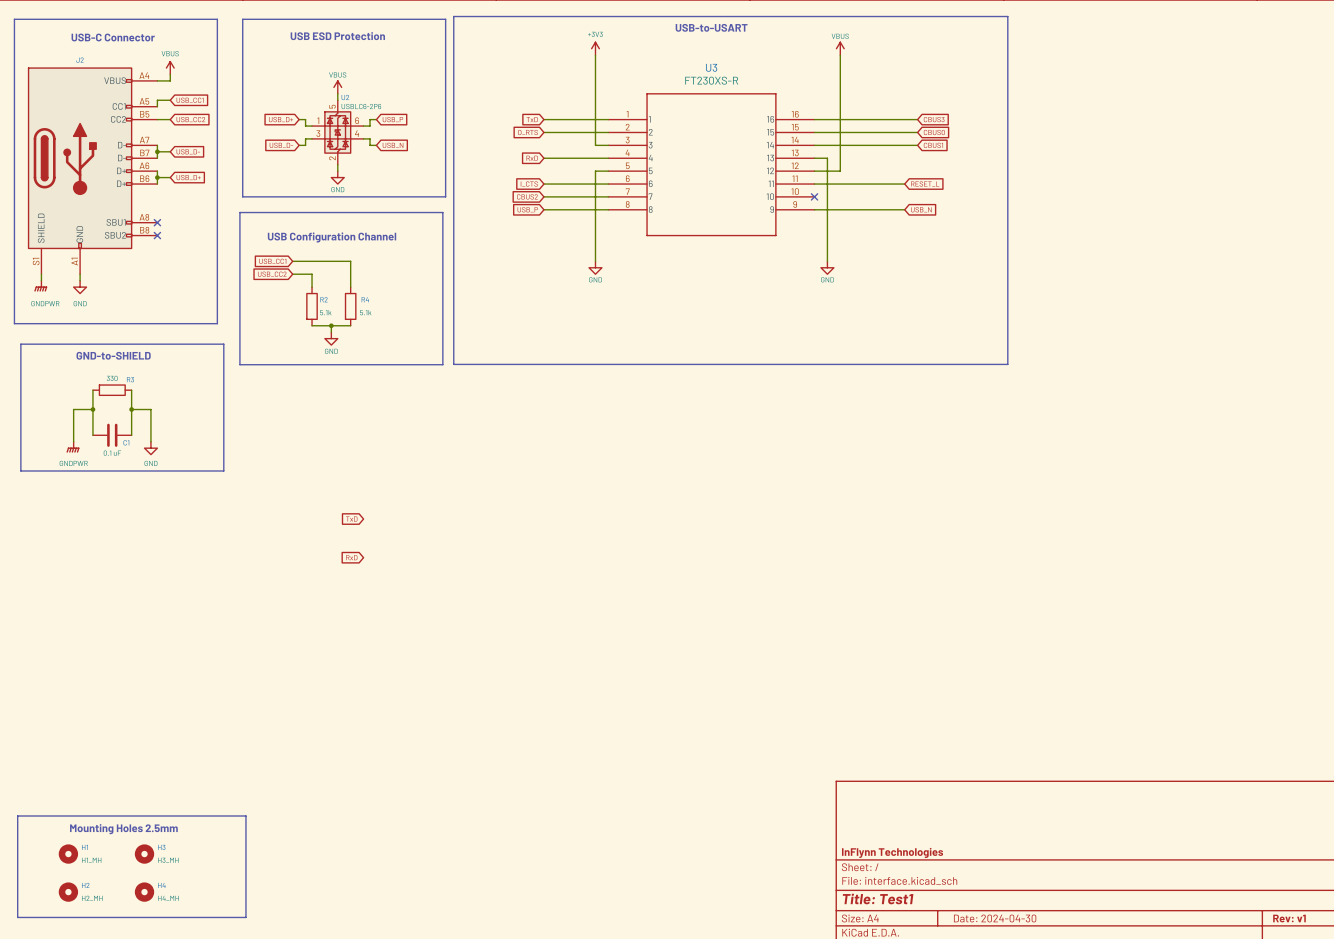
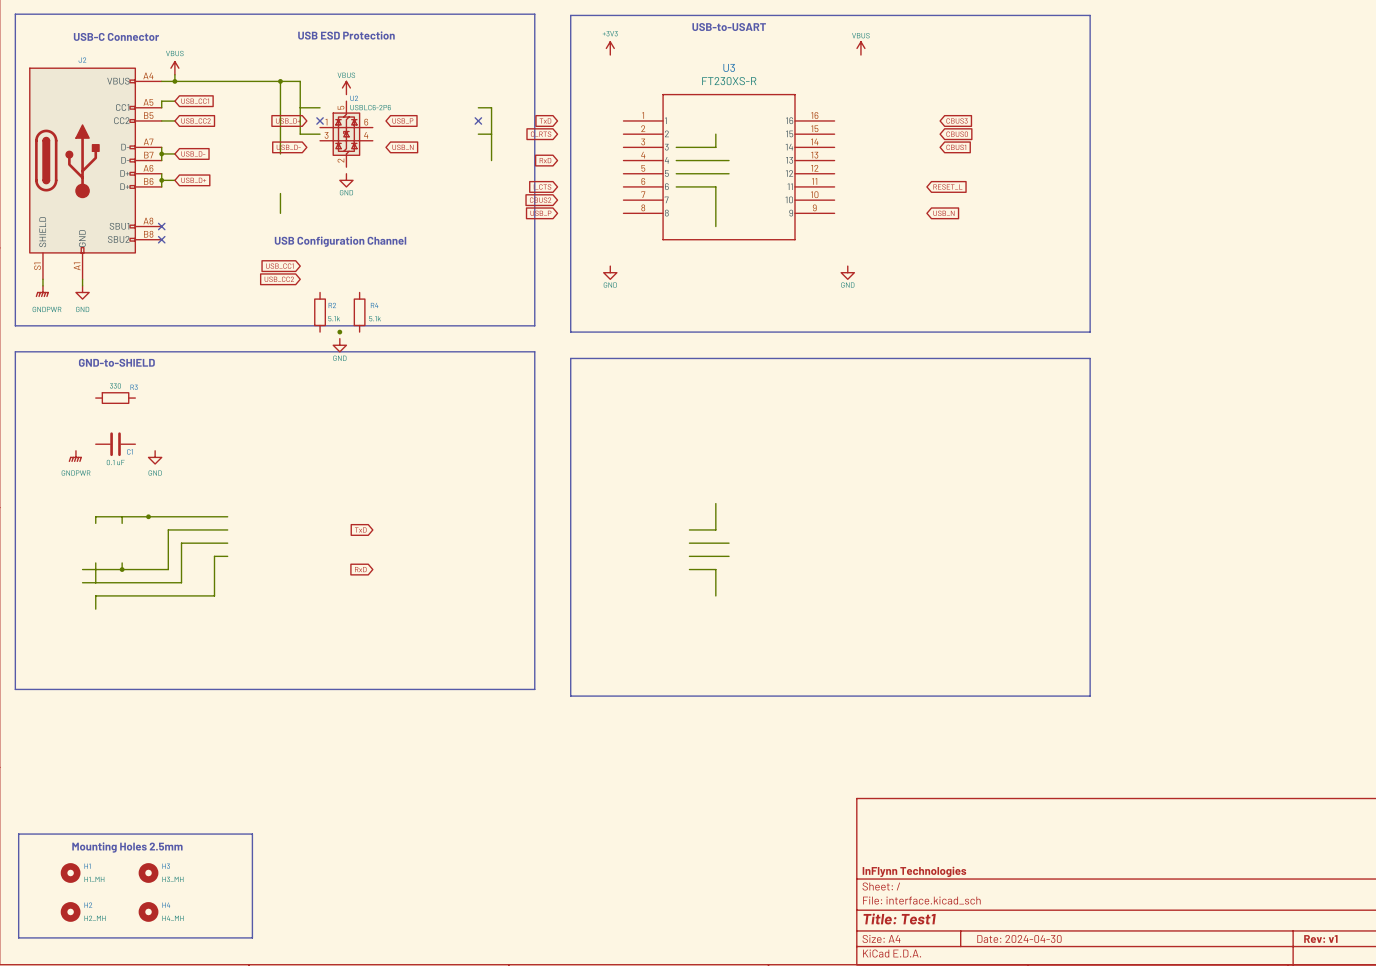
line: (556, 16) (453, 16) (453, 364) (1007, 364) (1007, 16) -> (570, 15) (570, 332) (1090, 332) (1090, 15) (1032, 15)
line: (14, 19) (217, 19) (217, 323) (14, 323) (14, 319) -> (15, 18) (15, 14) (534, 14) (534, 325) (15, 325)
line: (242, 19) (445, 19) (445, 196) (242, 196) (242, 19) -> none
wire: (595, 55) (595, 145) (608, 145) -> none
wire: (840, 55) (840, 171) (814, 171) -> none
wire: none -> (174, 81) (300, 81) (300, 134) (320, 134)
junction: none -> (174, 81)
wire: none -> (280, 81) (280, 153)
junction: none -> (280, 81)
wire: (337, 93) (337, 100) -> none
wire: none -> (300, 107) (320, 107)
wire: none -> (478, 107) (491, 107) (491, 160)
wire: (299, 119) (305, 119) (305, 126) (312, 126) -> none
no-connect mark: none -> (320, 120)
wire: (376, 119) (370, 119) (370, 126) (363, 126) -> none
no-connect mark: none -> (478, 120)
wire: (543, 119) (608, 119) -> none
wire: (814, 119) (917, 119) -> none
wire: none -> (478, 134) (491, 134)
wire: (543, 132) (608, 132) -> none
wire: none -> (715, 134) (715, 147) (676, 147)
wire: (814, 132) (917, 132) -> none
wire: (312, 138) (305, 138) (305, 145) (299, 145) -> none
wire: (363, 138) (370, 138) (370, 145) (376, 145) -> none
wire: (814, 145) (917, 145) -> none
wire: (543, 158) (608, 158) -> none
wire: none -> (676, 160) (729, 160)
wire: (814, 158) (827, 158) (827, 261) -> none
wire: (337, 164) (337, 171) -> none
wire: (608, 171) (595, 171) (595, 261) -> none
wire: none -> (676, 173) (729, 173)
wire: (543, 184) (608, 184) -> none
wire: none -> (676, 186) (715, 186) (715, 226)
wire: (814, 184) (904, 184) -> none
wire: none -> (280, 193) (280, 213)
wire: (543, 196) (608, 196) -> none
no-connect mark: (814, 196) -> none
wire: (543, 209) (608, 209) -> none
wire: (814, 209) (904, 209) -> none
line: (239, 212) (442, 212) (442, 364) (239, 364) (239, 212) -> none
wire: (292, 261) (350, 261) (350, 287) -> none
wire: (292, 274) (312, 274) (312, 287) -> none
wire: (312, 325) (350, 325) -> none
wire: (331, 325) (331, 332) -> none
line: (20, 344) (223, 344) (223, 470) (20, 470) (20, 344) -> none
line: none -> (15, 351) (15, 689) (534, 689) (534, 351) (15, 351)
line: none -> (570, 358) (1090, 358) (1090, 696) (570, 696) (570, 358)
wire: (92, 390) (92, 435) -> none
wire: (131, 390) (131, 435) -> none
wire: (92, 409) (73, 409) (73, 441) -> none
junction: (92, 409) -> none
wire: (131, 409) (150, 409) (150, 441) -> none
junction: (131, 409) -> none
wire: none -> (715, 503) (715, 529) (689, 529)
wire: none -> (122, 516) (122, 523)
junction: none -> (148, 516)
wire: none -> (227, 516) (95, 516) (95, 523)
wire: none -> (227, 529) (168, 529) (168, 569) (82, 569)
wire: none -> (227, 543) (181, 543) (181, 582) (82, 582)
wire: none -> (689, 543) (729, 543)
wire: none -> (227, 556) (214, 556) (214, 595) (95, 595) (95, 609)
wire: none -> (689, 556) (729, 556)
wire: none -> (95, 562) (95, 582)
wire: none -> (122, 562) (122, 569)
junction: none -> (122, 569)
wire: none -> (689, 569) (715, 569) (715, 595)

